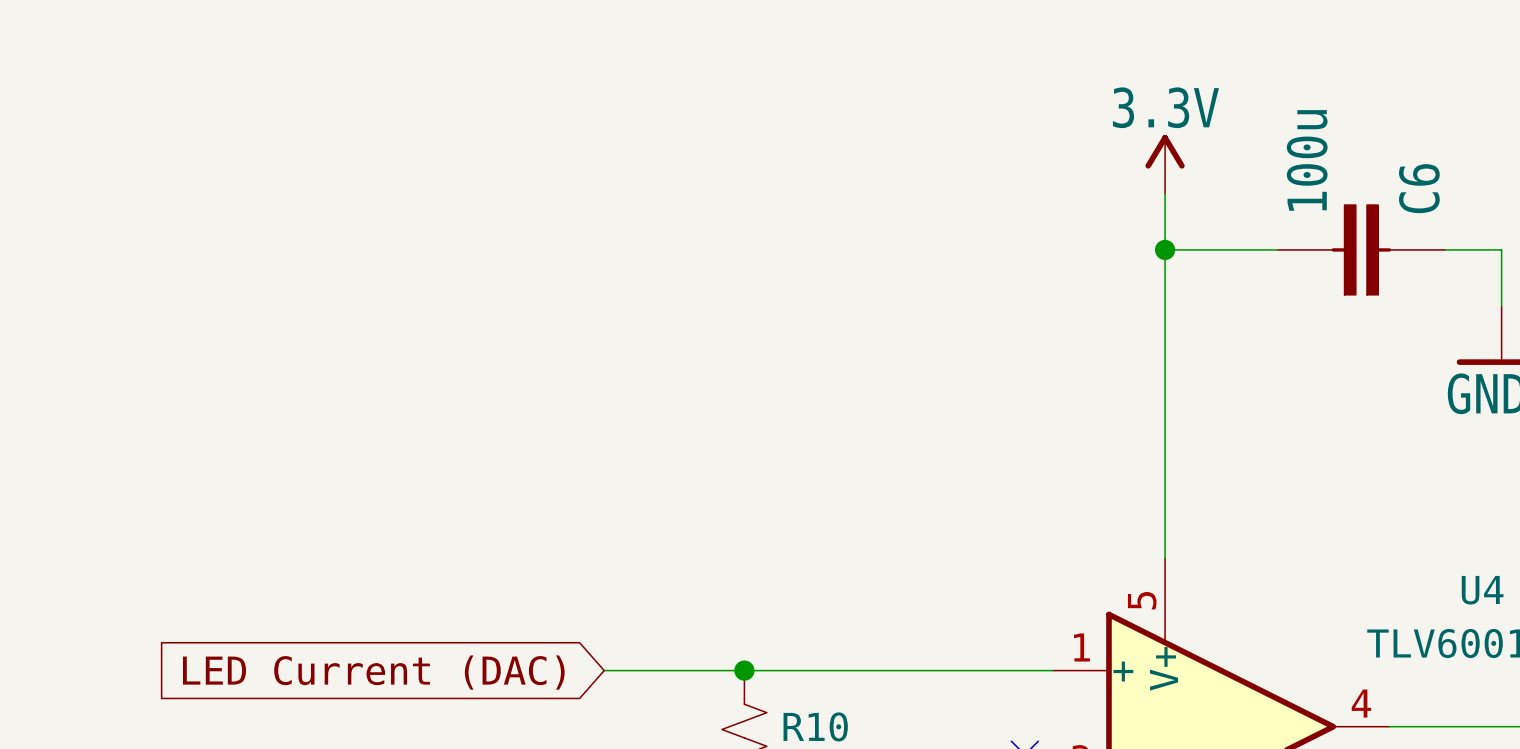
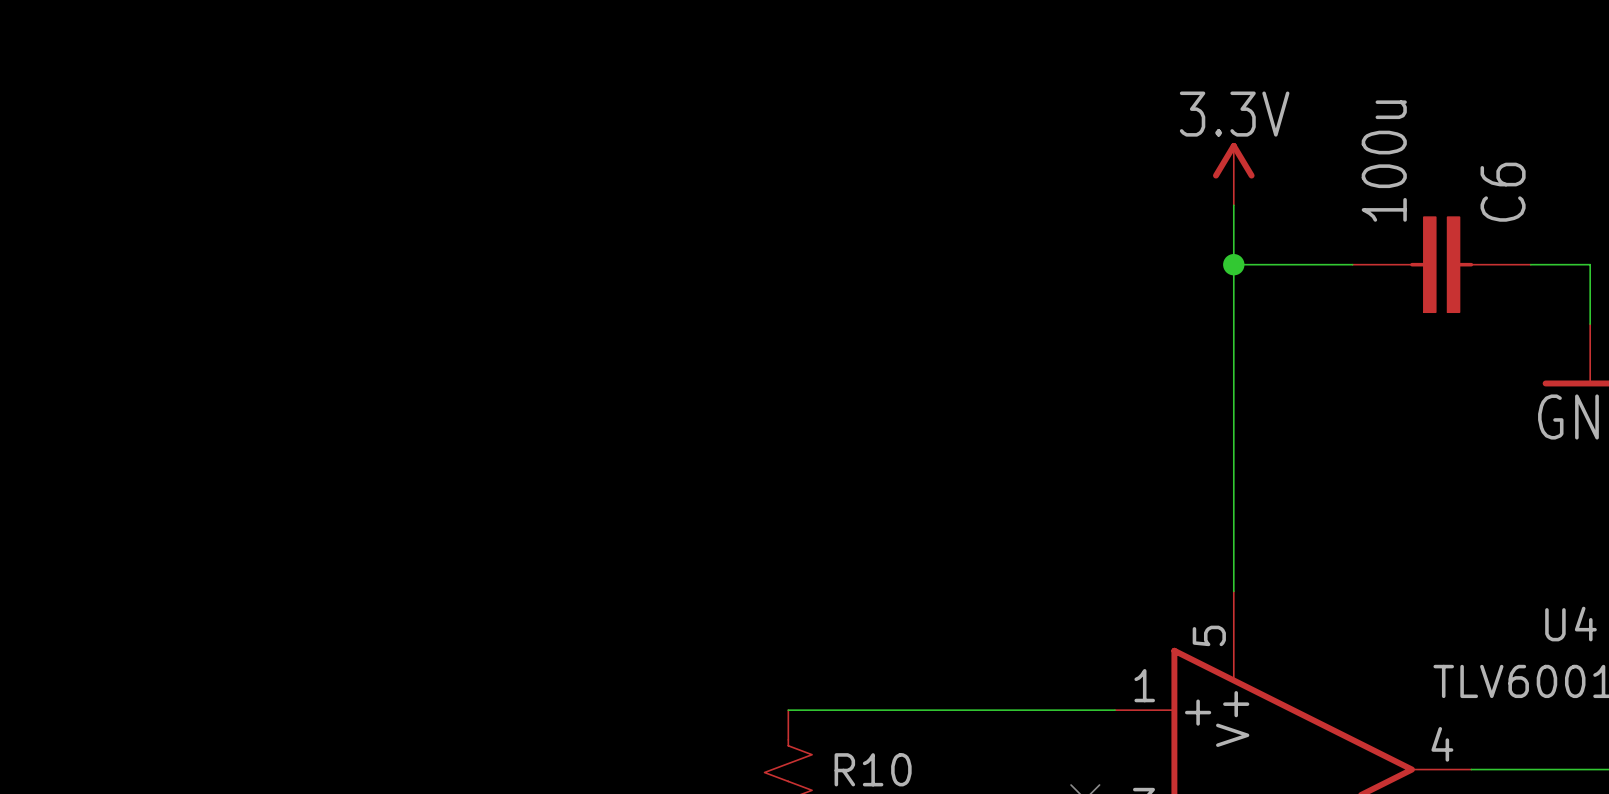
wire: (604, 670) (744, 670) -> none
junction: (744, 670) -> none
global label: LED Current (DAC) (373, 672) -> none

